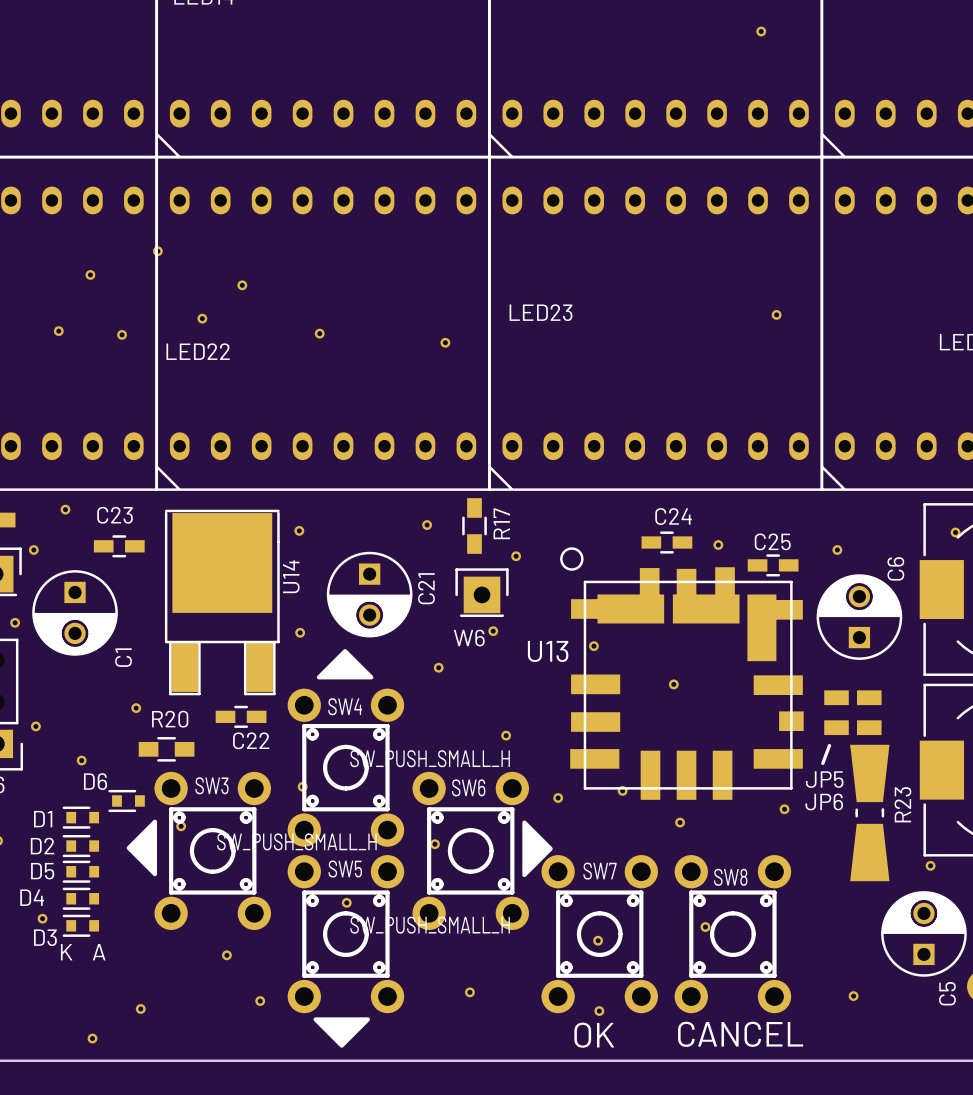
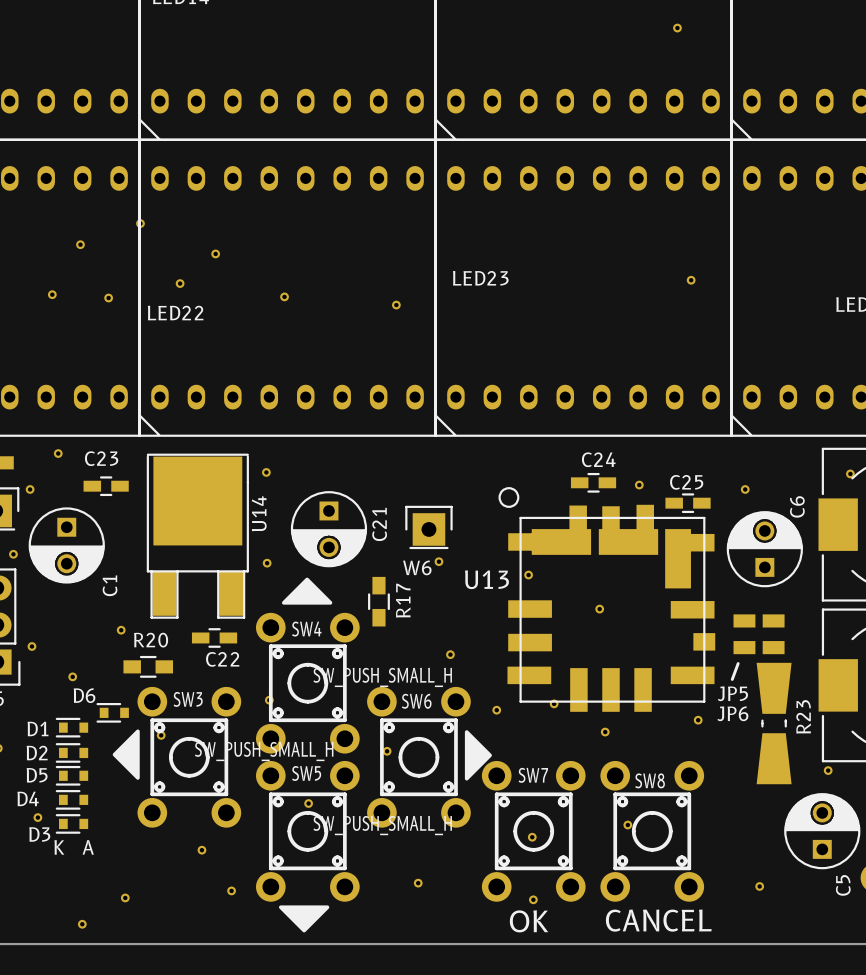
part: (427, 525) -> none
R17 position: (474, 525) -> (378, 601)
part: (516, 556) -> none
part: (438, 667) -> none

